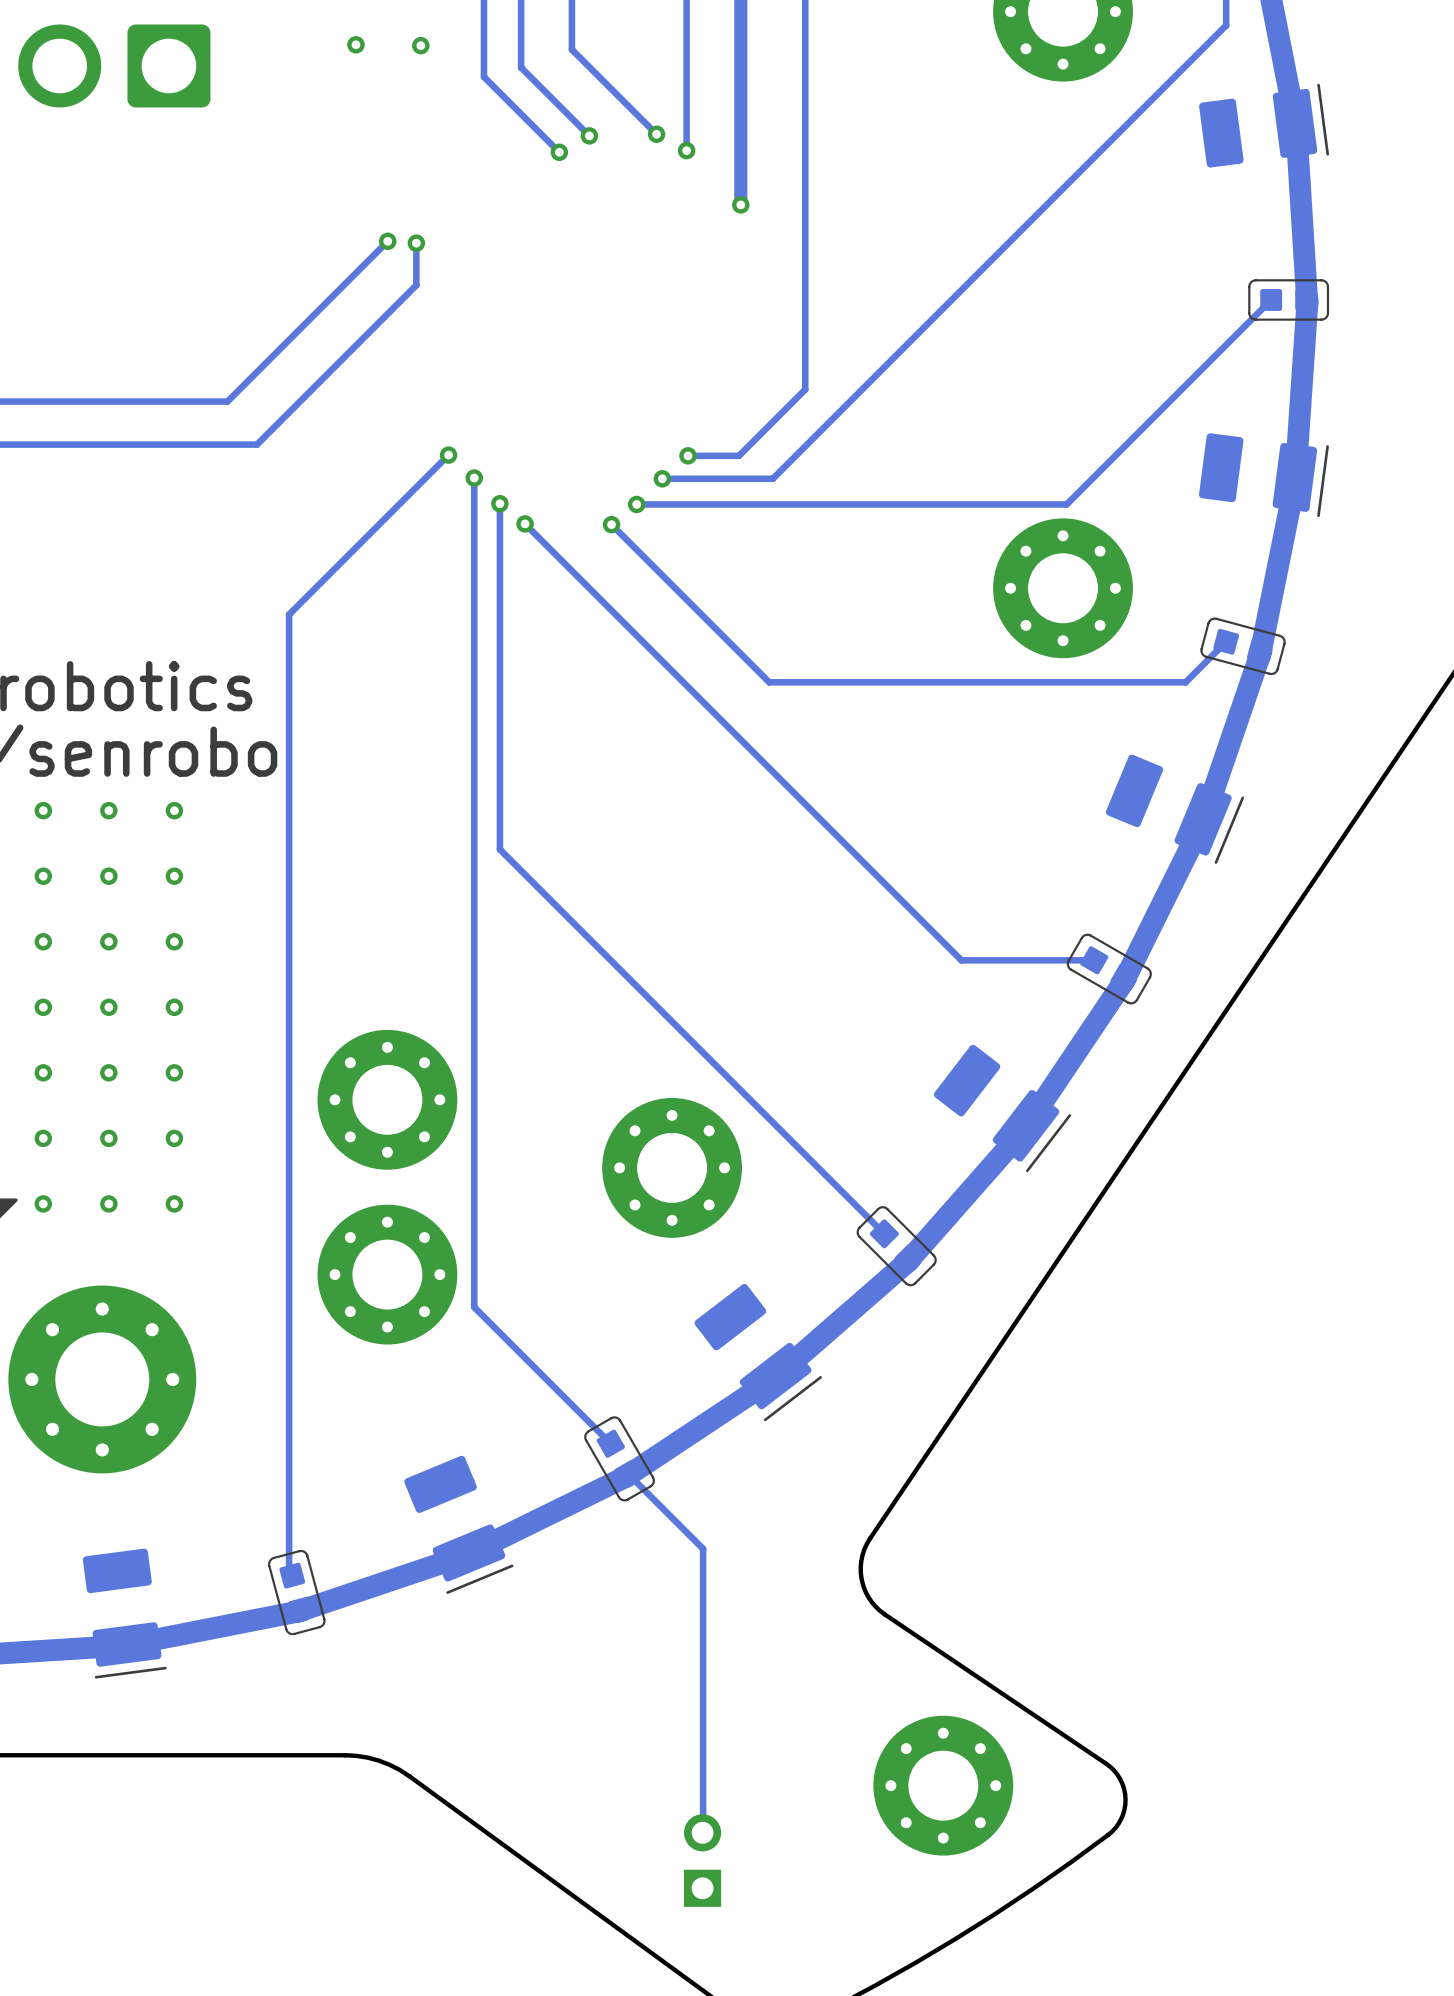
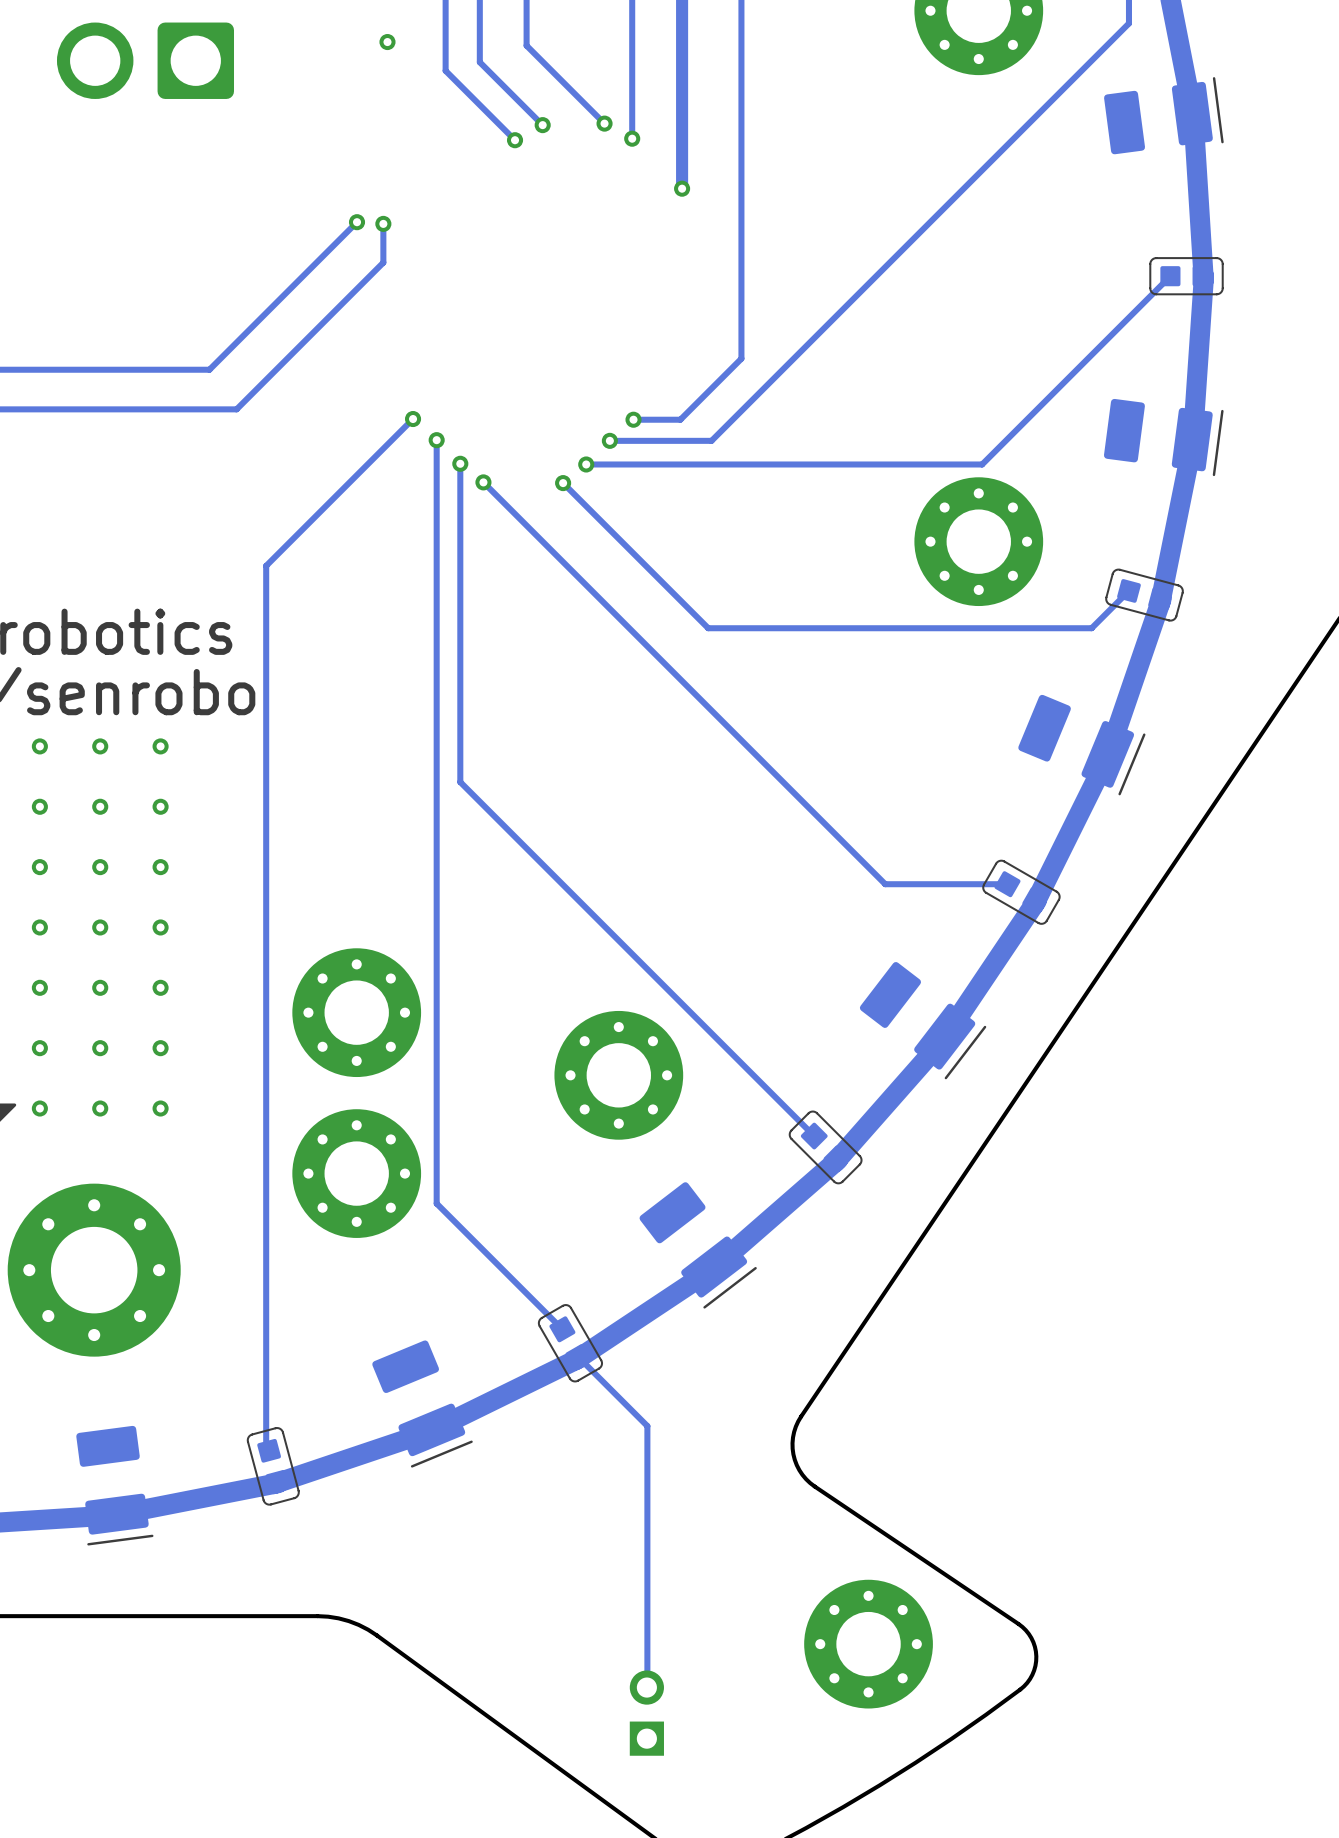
via: (355, 44) -> none
part position: (114, 65) -> (145, 60)

